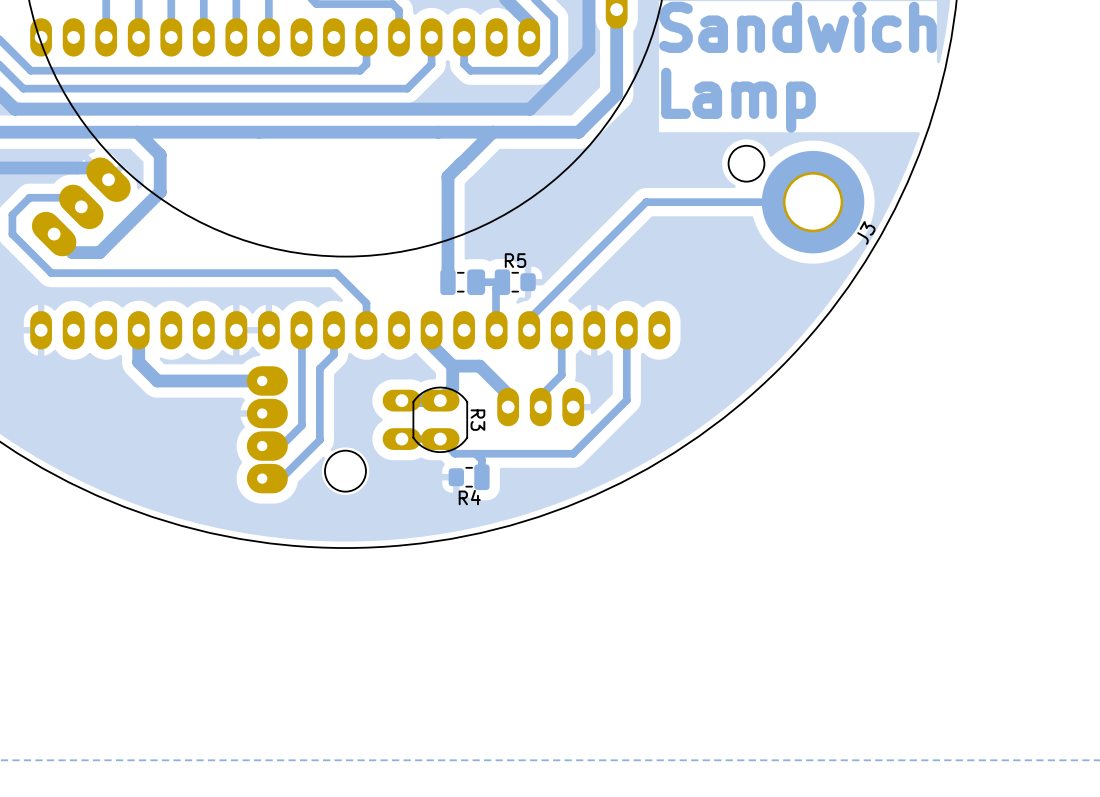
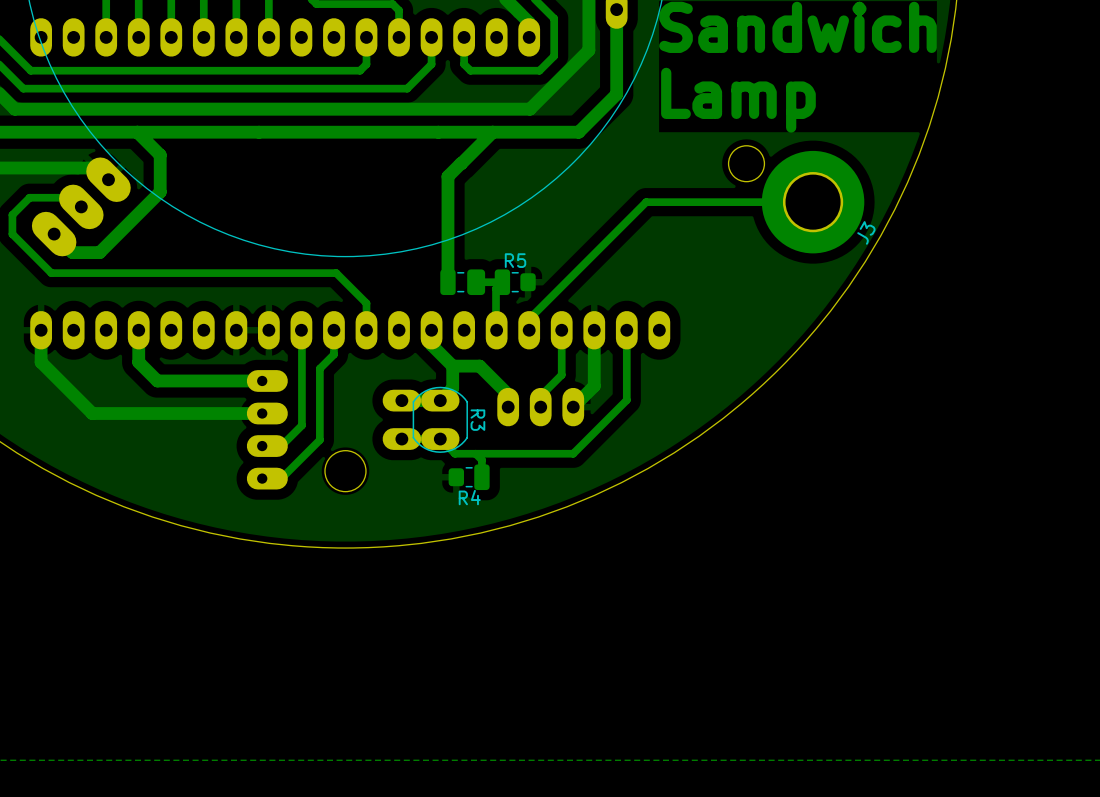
track: none -> (41, 330) (41, 362) (92, 413) (262, 413)
track: none -> (594, 330) (594, 386) (573, 407)
part footprint: [246, 366, 288, 494] -> [246, 370, 288, 490]

